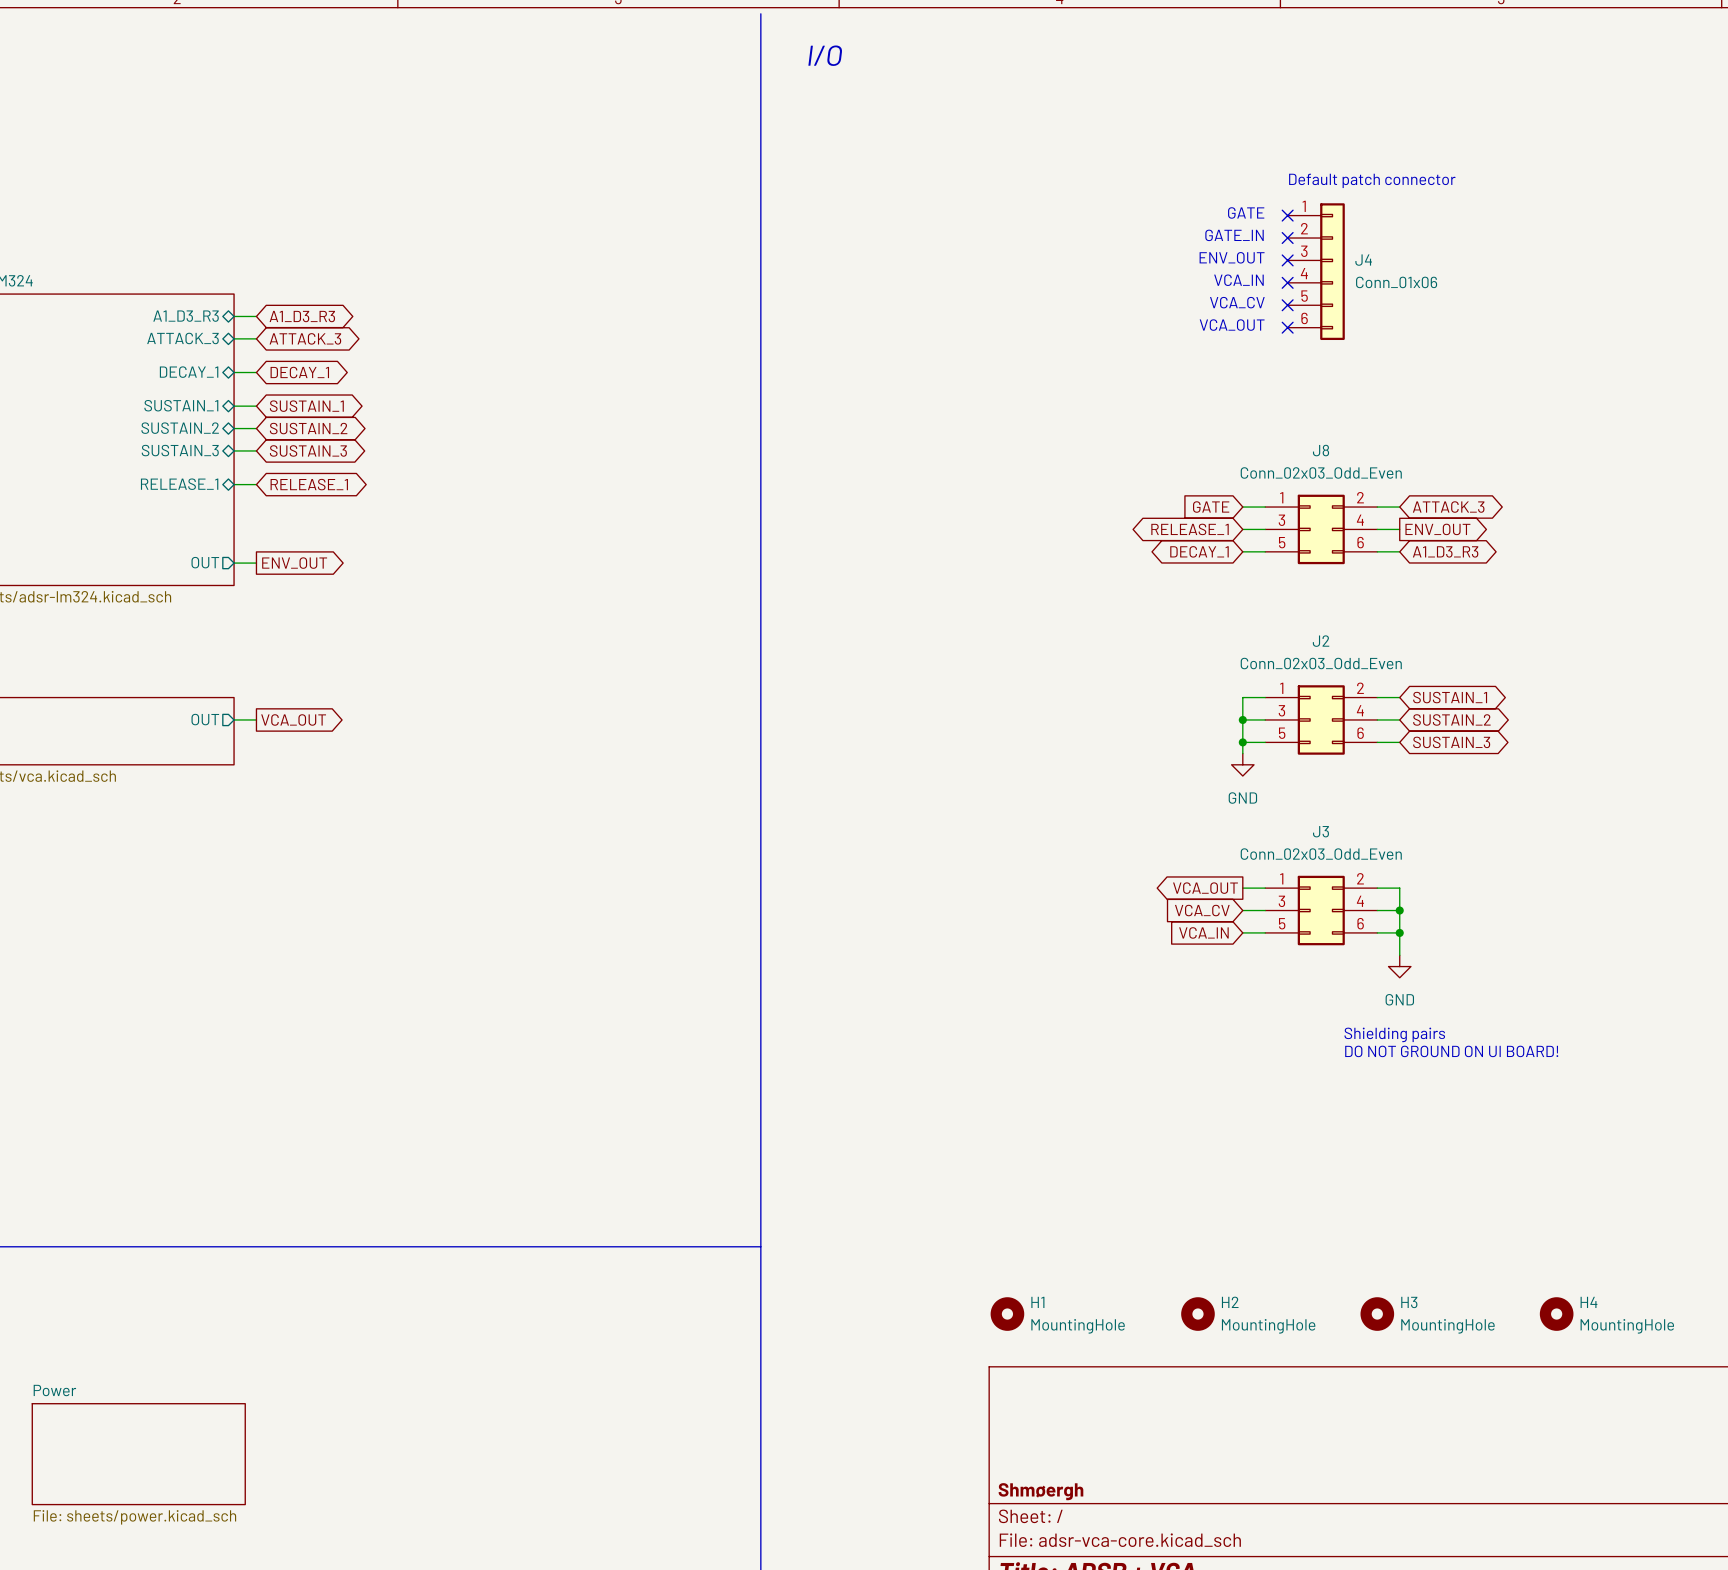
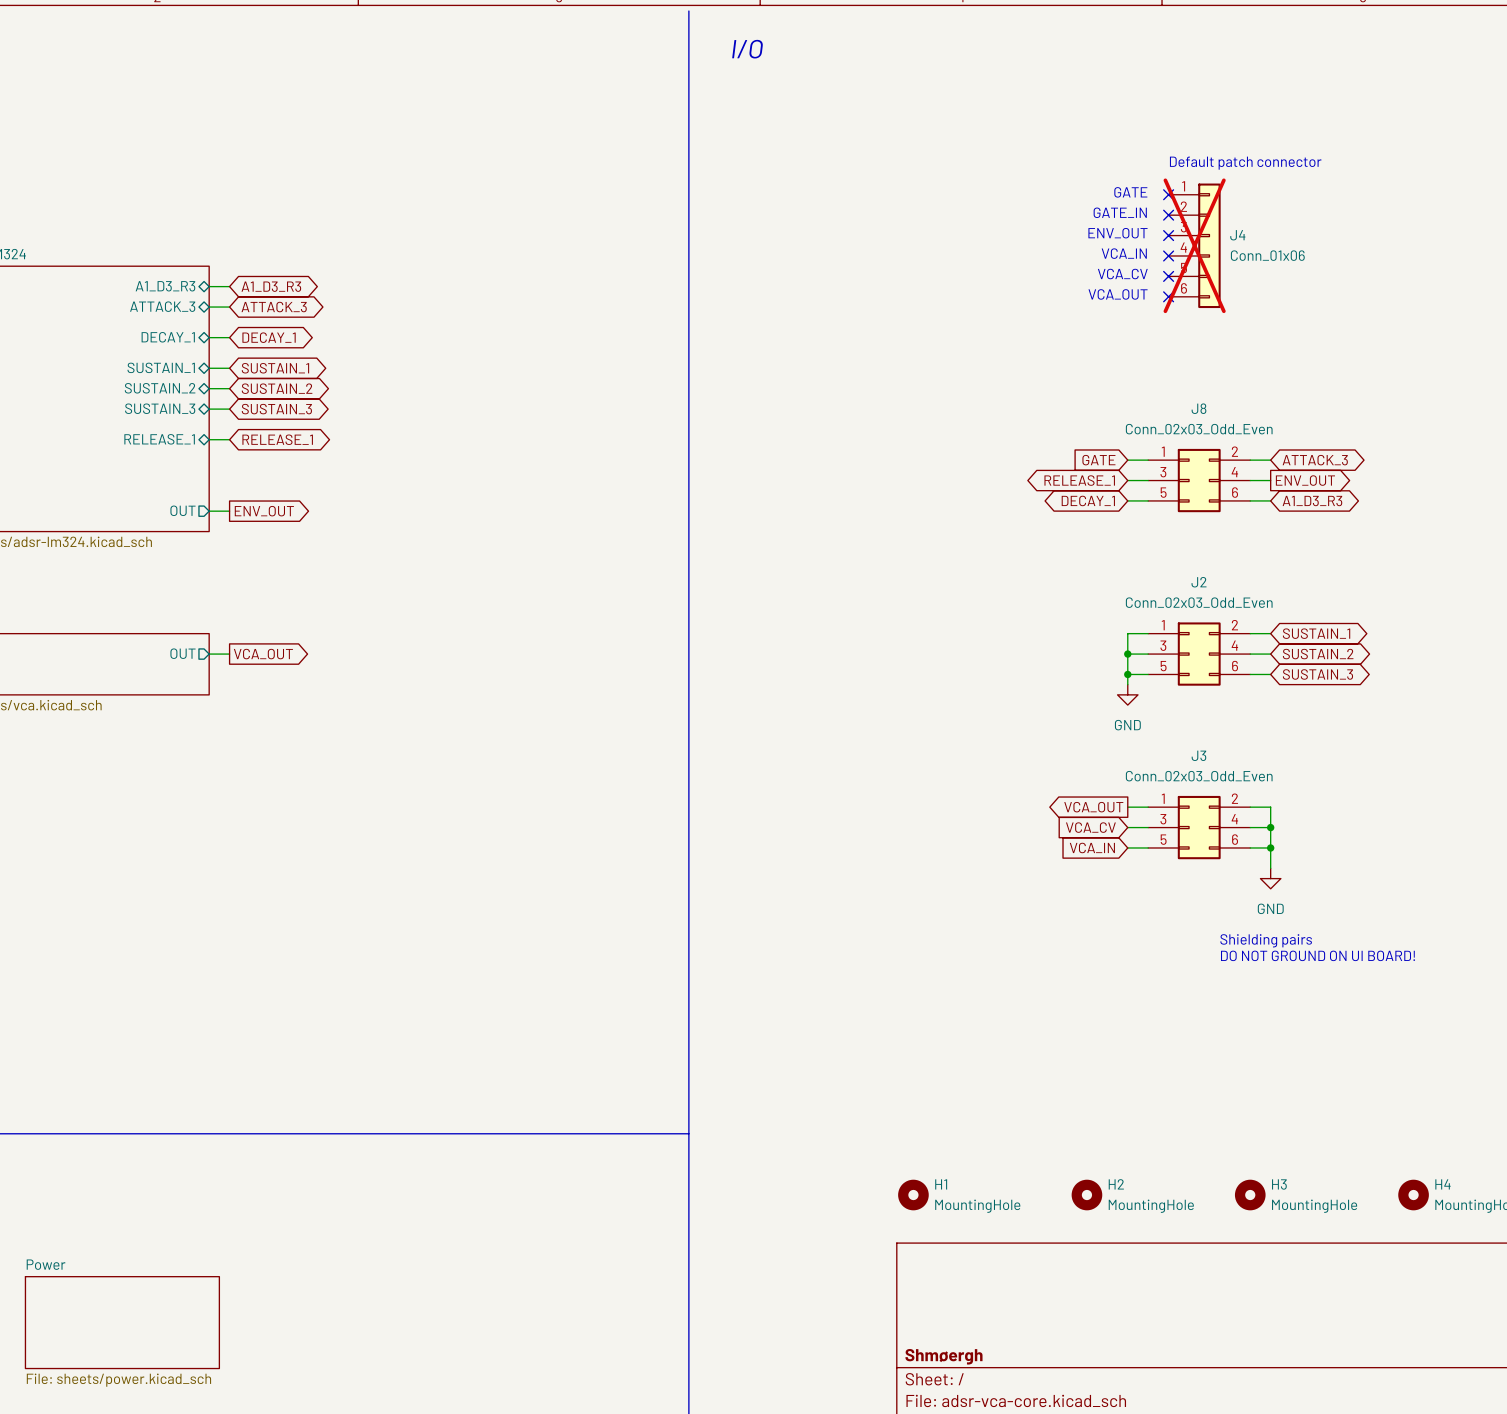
J4 do-not-place cross: none -> (1194, 245)

